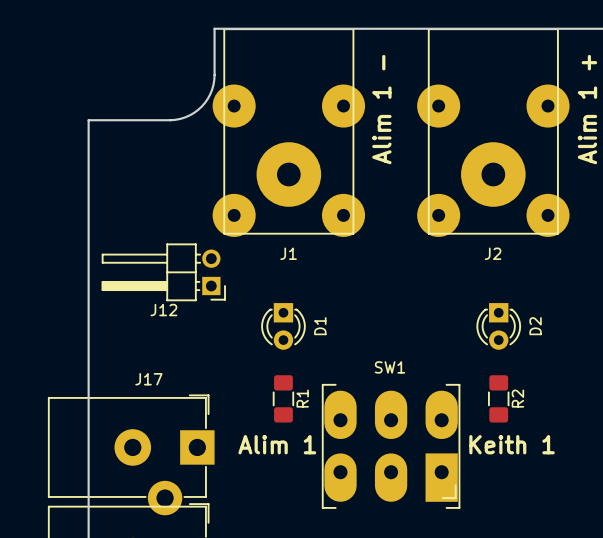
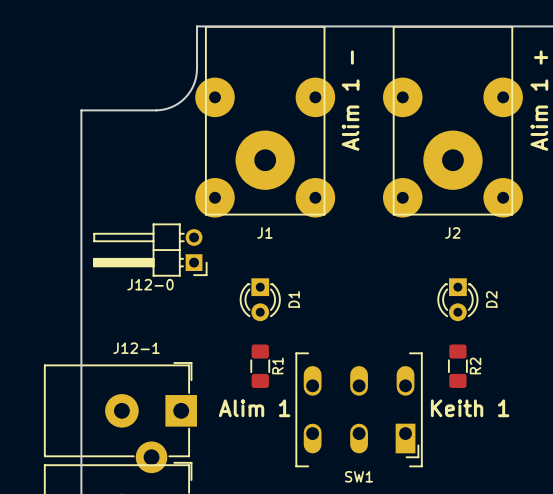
J12 name: J12 (163, 310) -> J12-0 (150, 284)
SW1 name position: SW1 (390, 367) -> SW1 (358, 476)
J17 name: J17 (148, 379) -> J12-1 (136, 348)
SW1 footprint: [322, 384, 461, 509] -> [295, 352, 423, 467]

